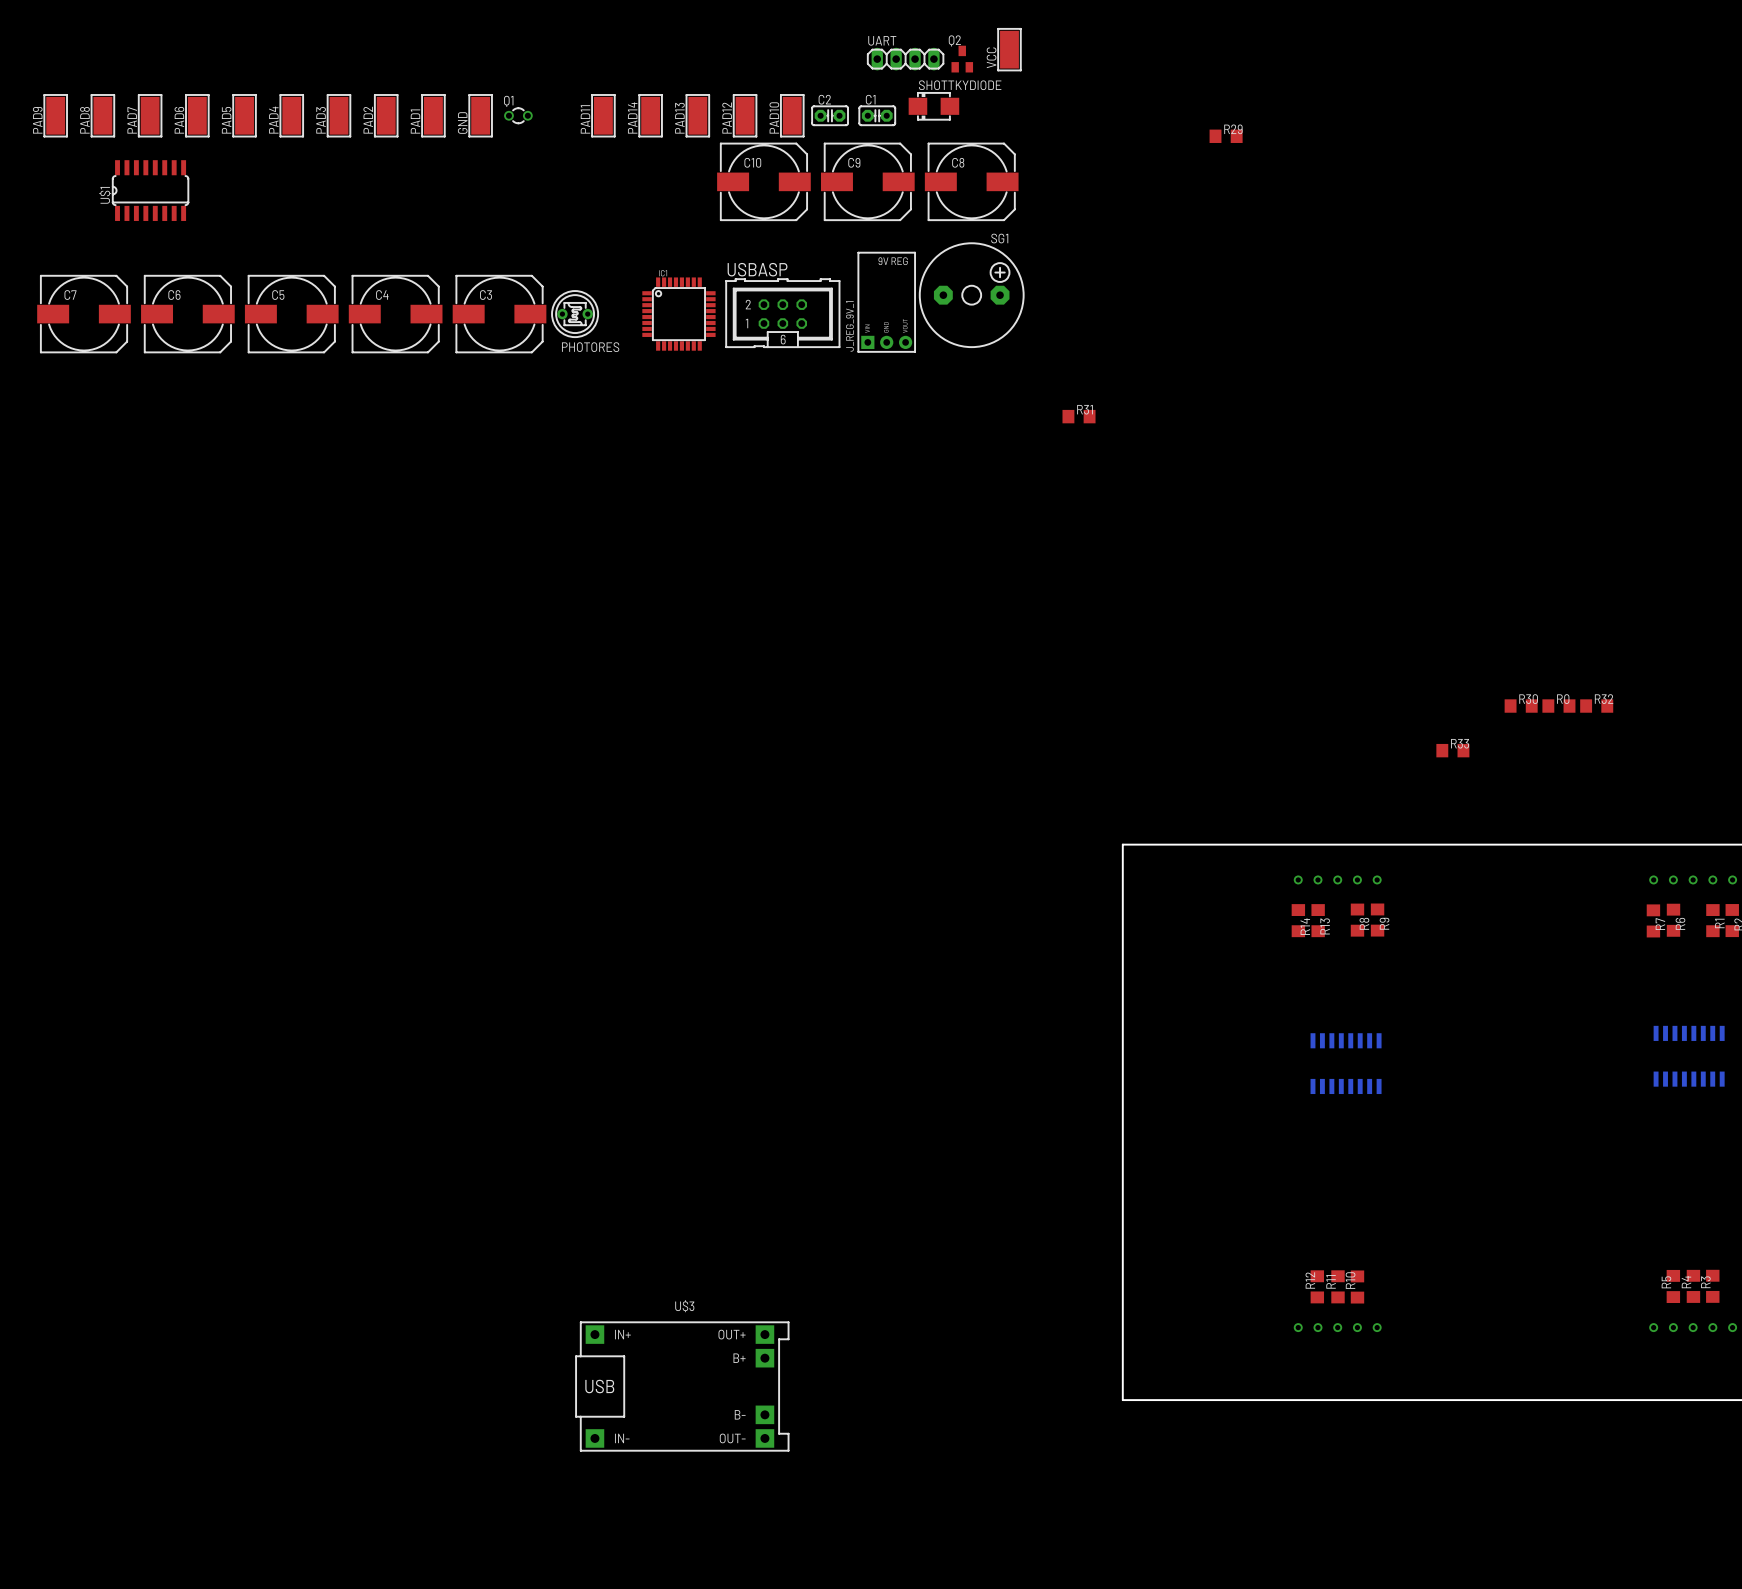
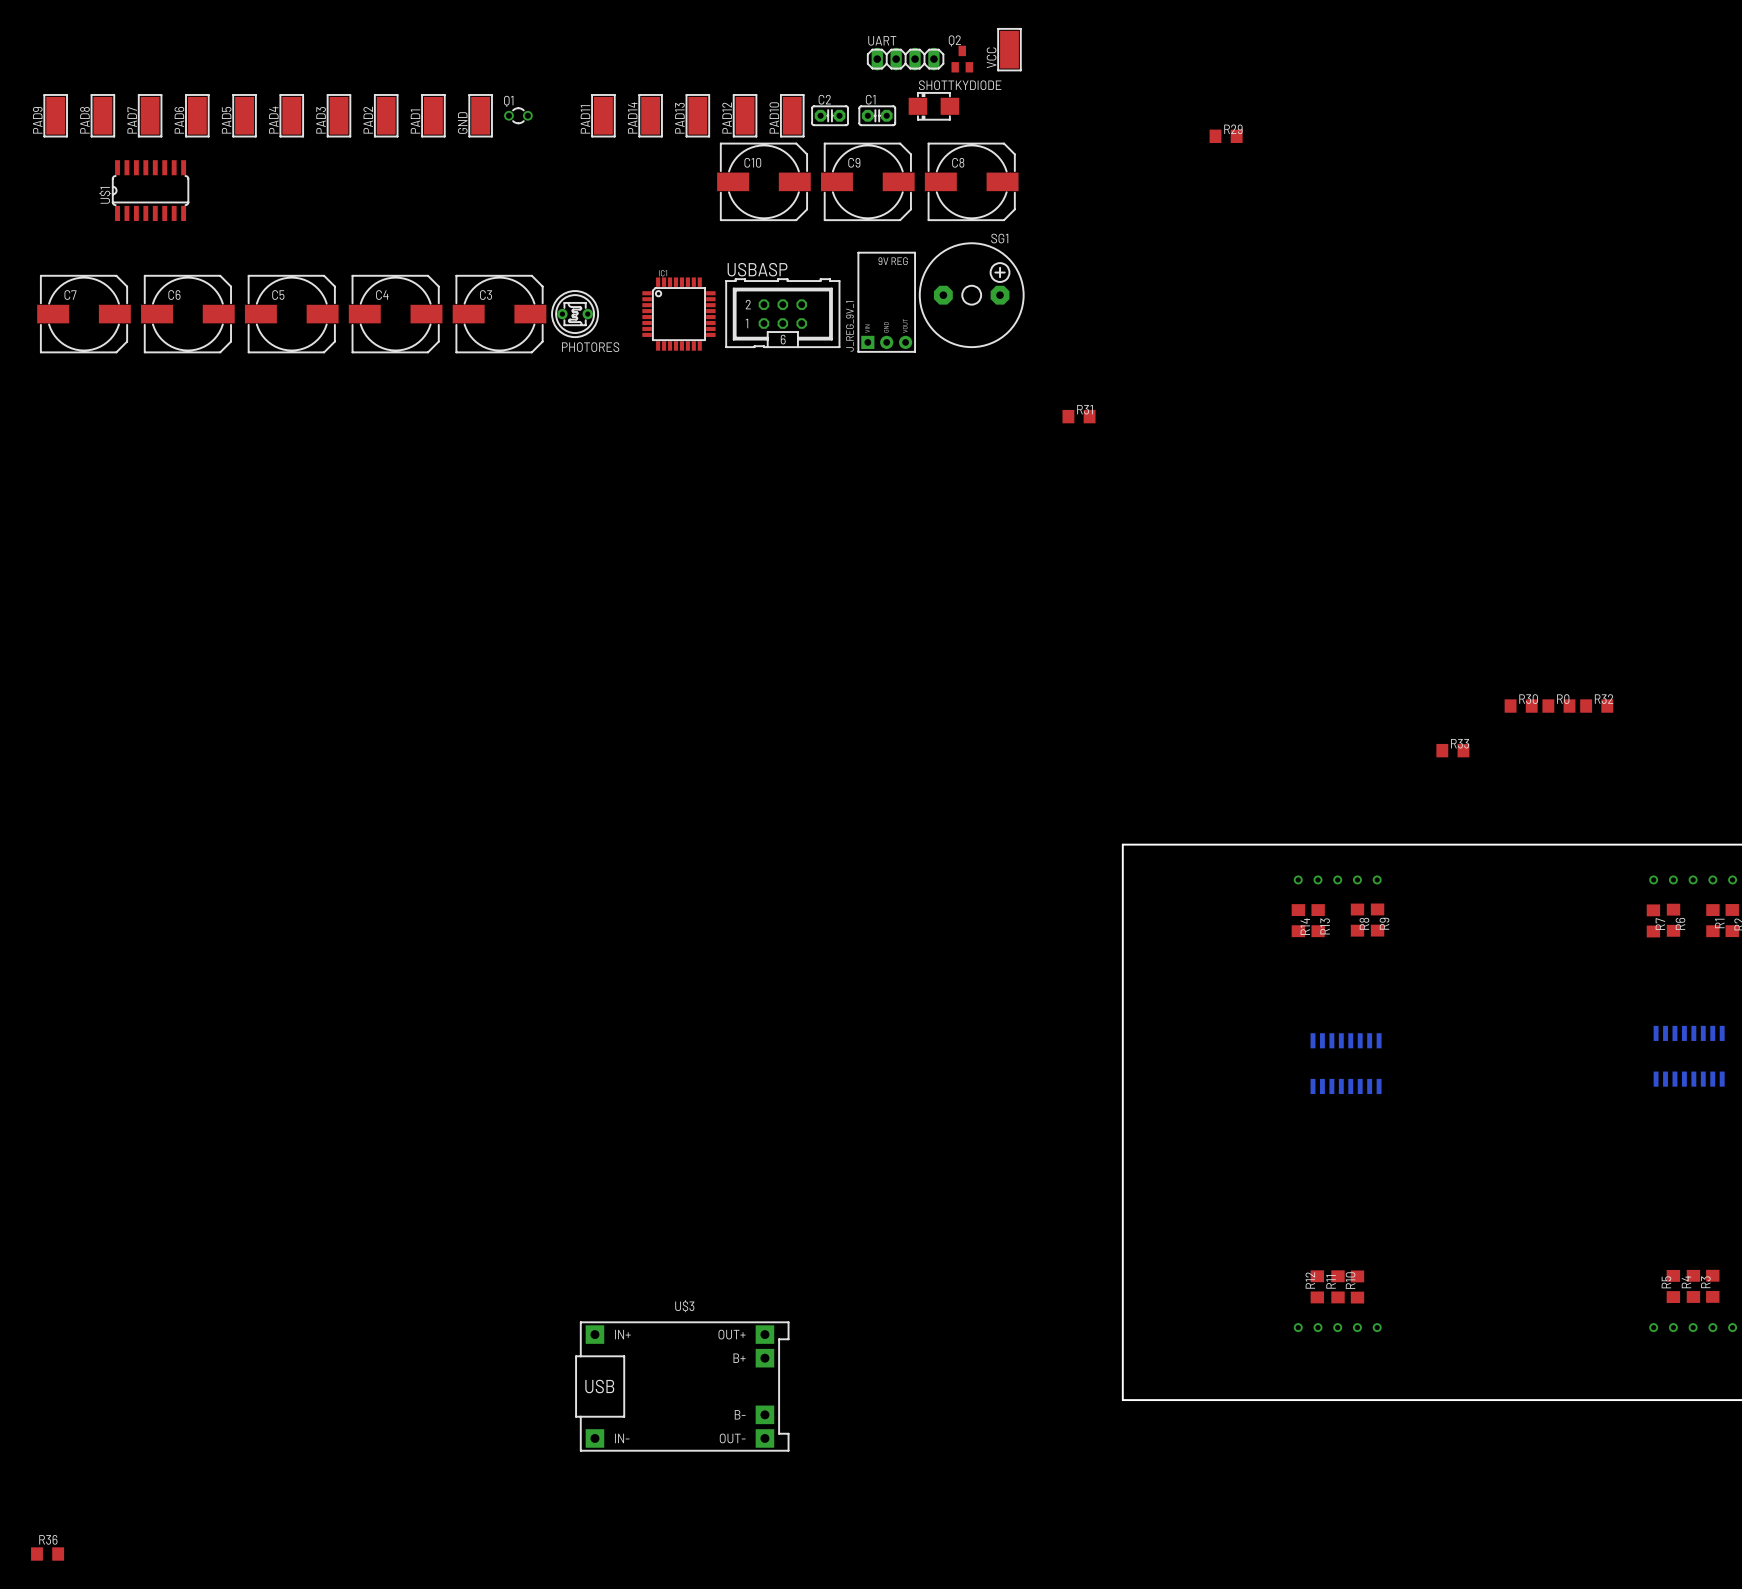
R36: none -> (47, 1554)

